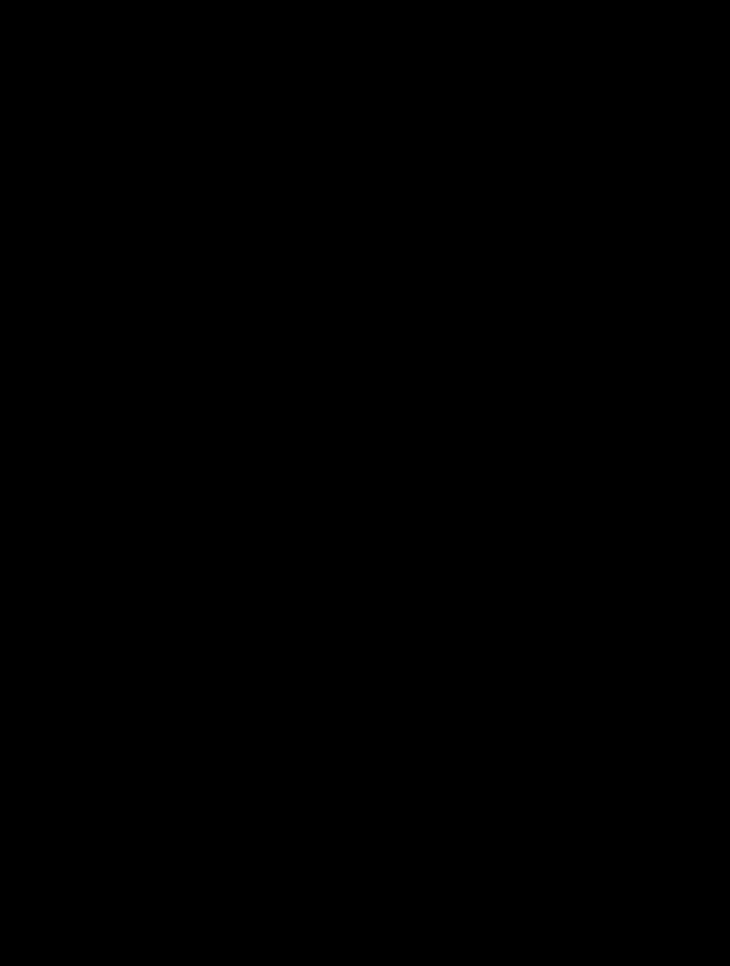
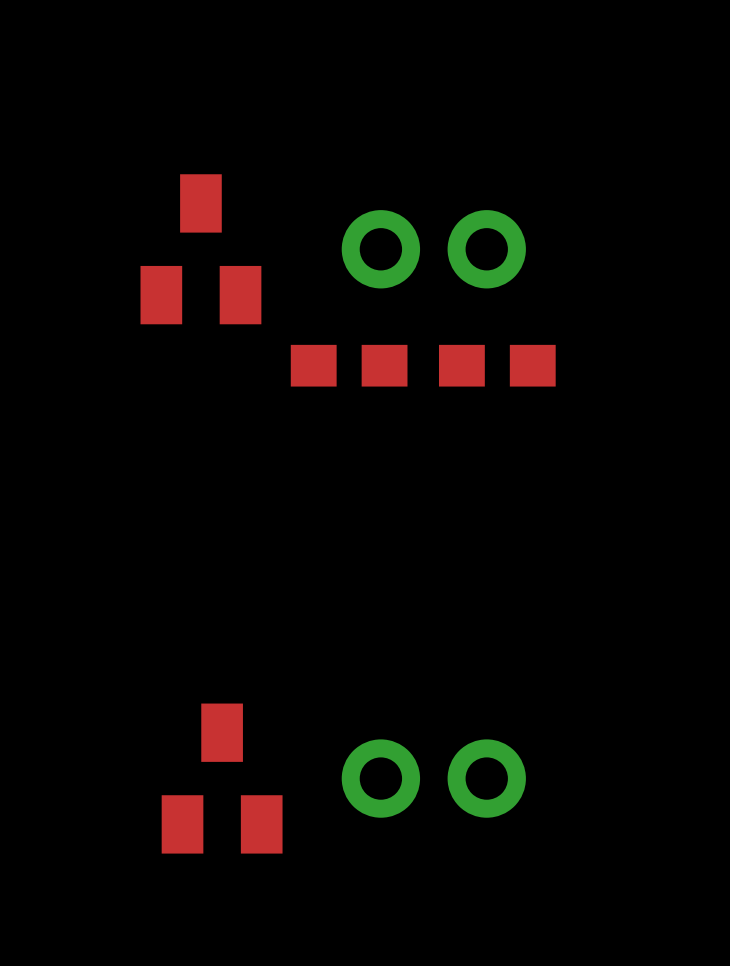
part: none -> (200, 249)
part: none -> (433, 249)
part: none -> (349, 365)
part: none -> (497, 365)
part: none -> (222, 778)
part: none -> (433, 778)

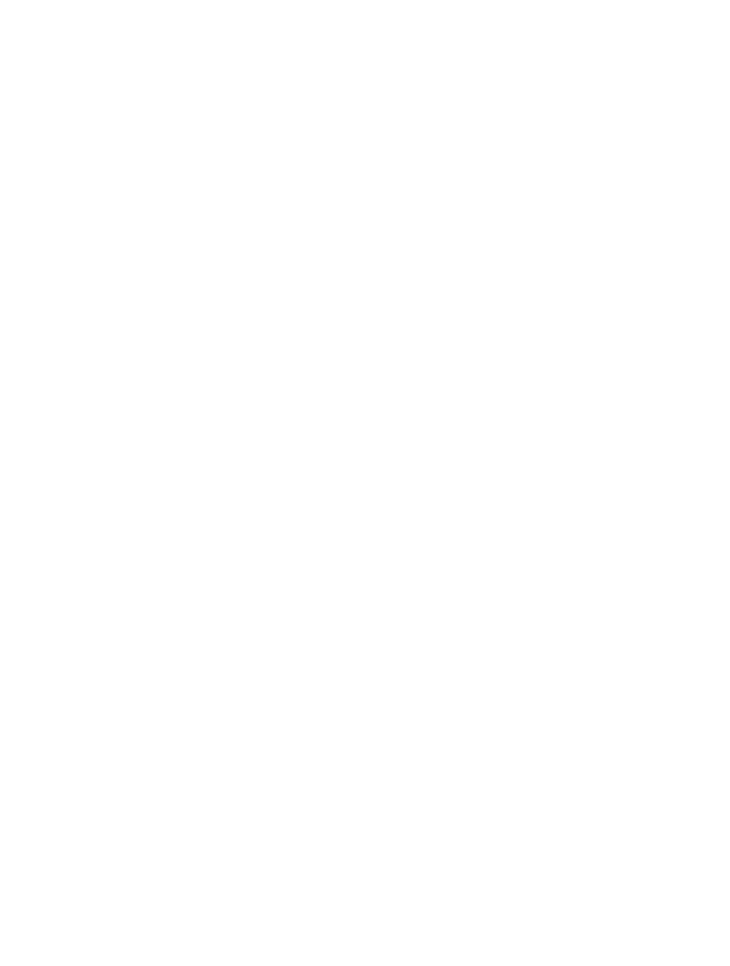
part: (200, 249) -> none
part: (433, 249) -> none
part: (349, 365) -> none
part: (497, 365) -> none
part: (222, 778) -> none
part: (433, 778) -> none

